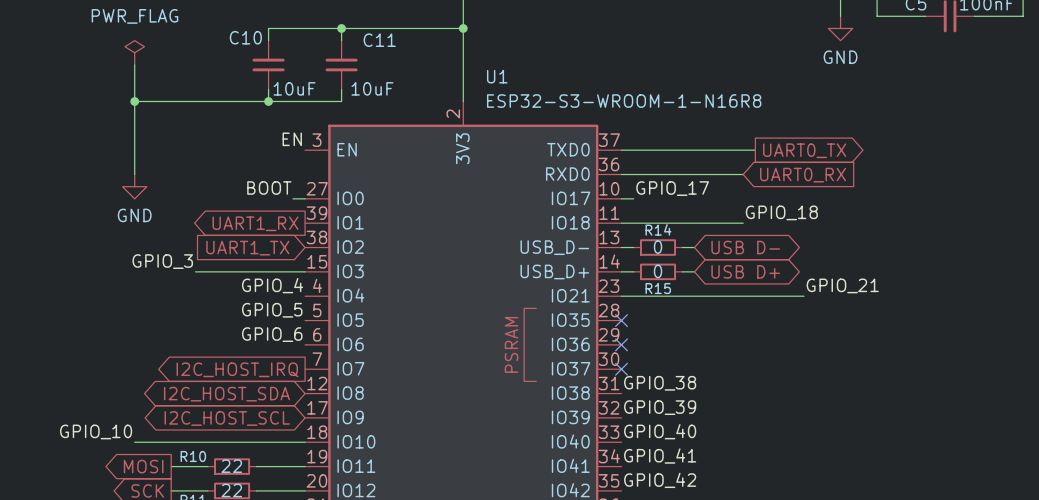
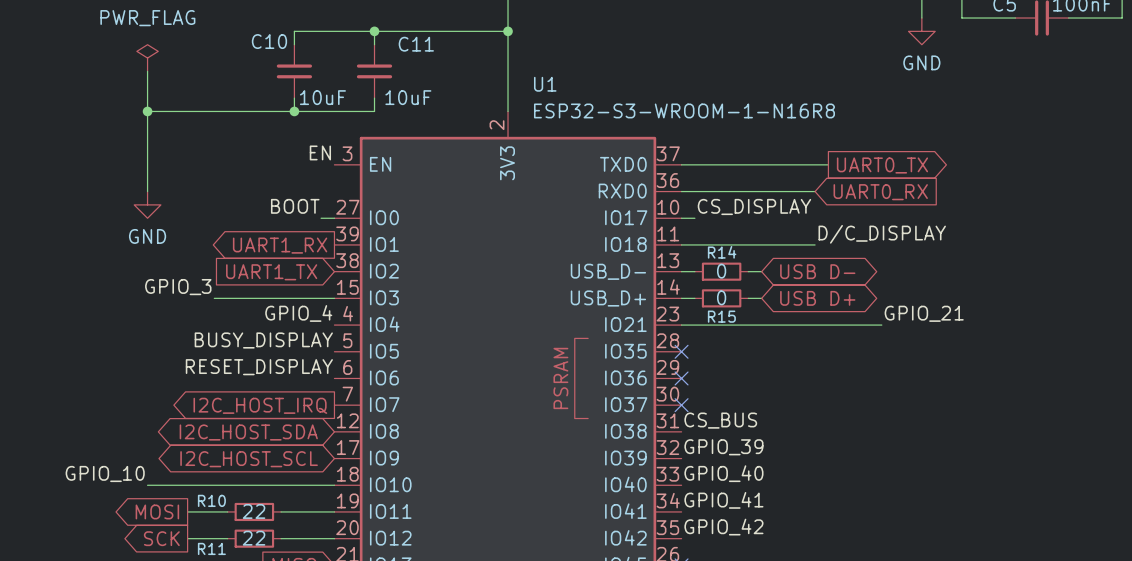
label: GPIO_17 (672, 188) -> CS_DISPLAY (754, 206)
label: GPIO_18 (781, 212) -> D/C_DISPLAY (882, 234)
label: GPIO_5 (272, 310) -> BUSY_DISPLAY (263, 340)
label: GPIO_6 (272, 334) -> RESET_DISPLAY (259, 367)
label: GPIO_38 (660, 383) -> CS_BUS (720, 420)

